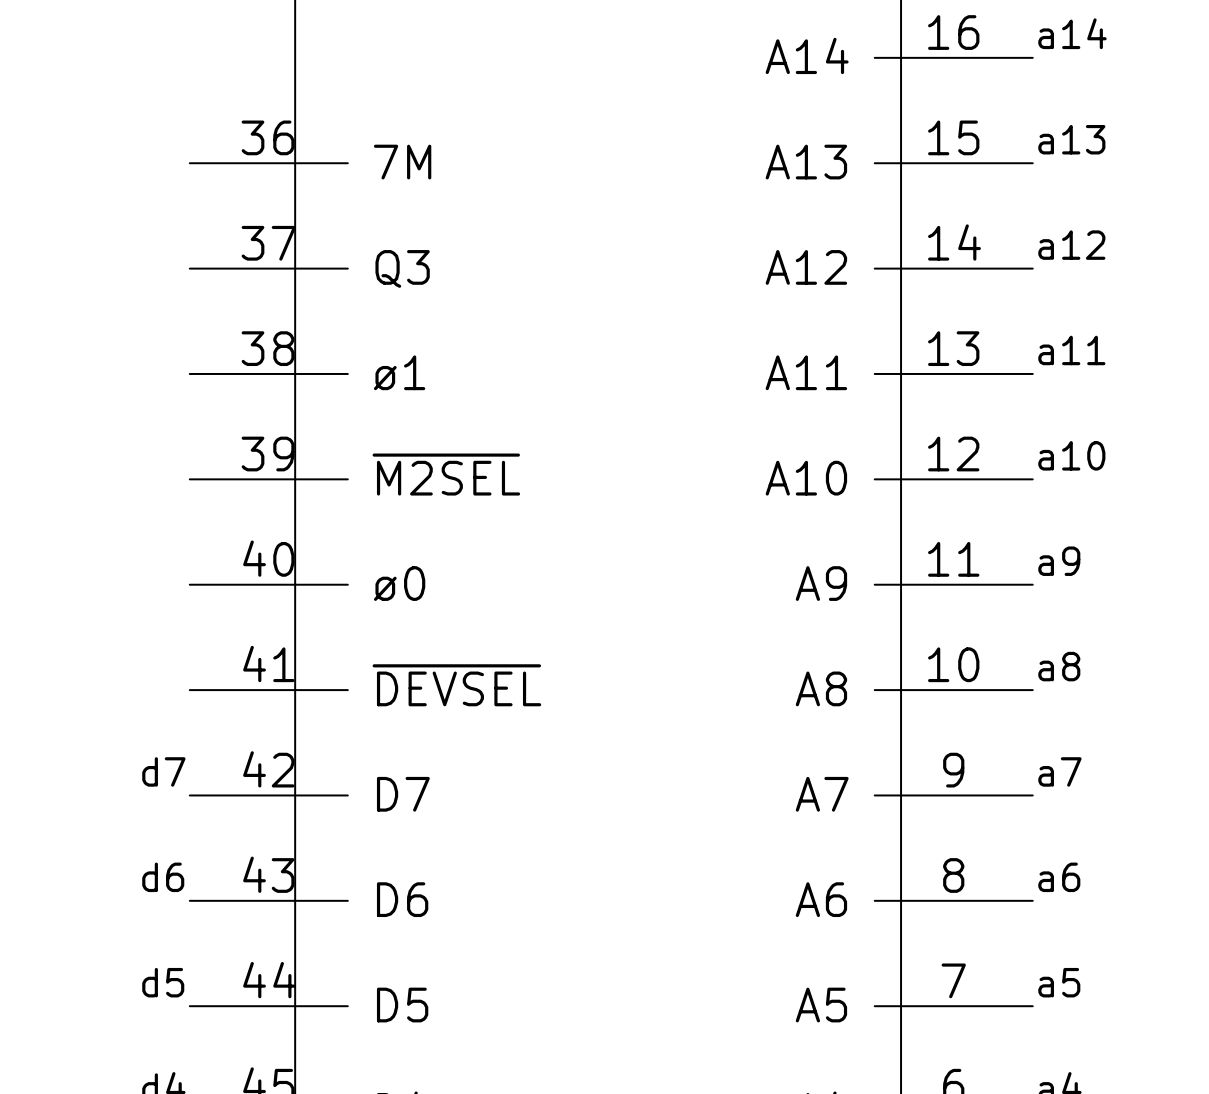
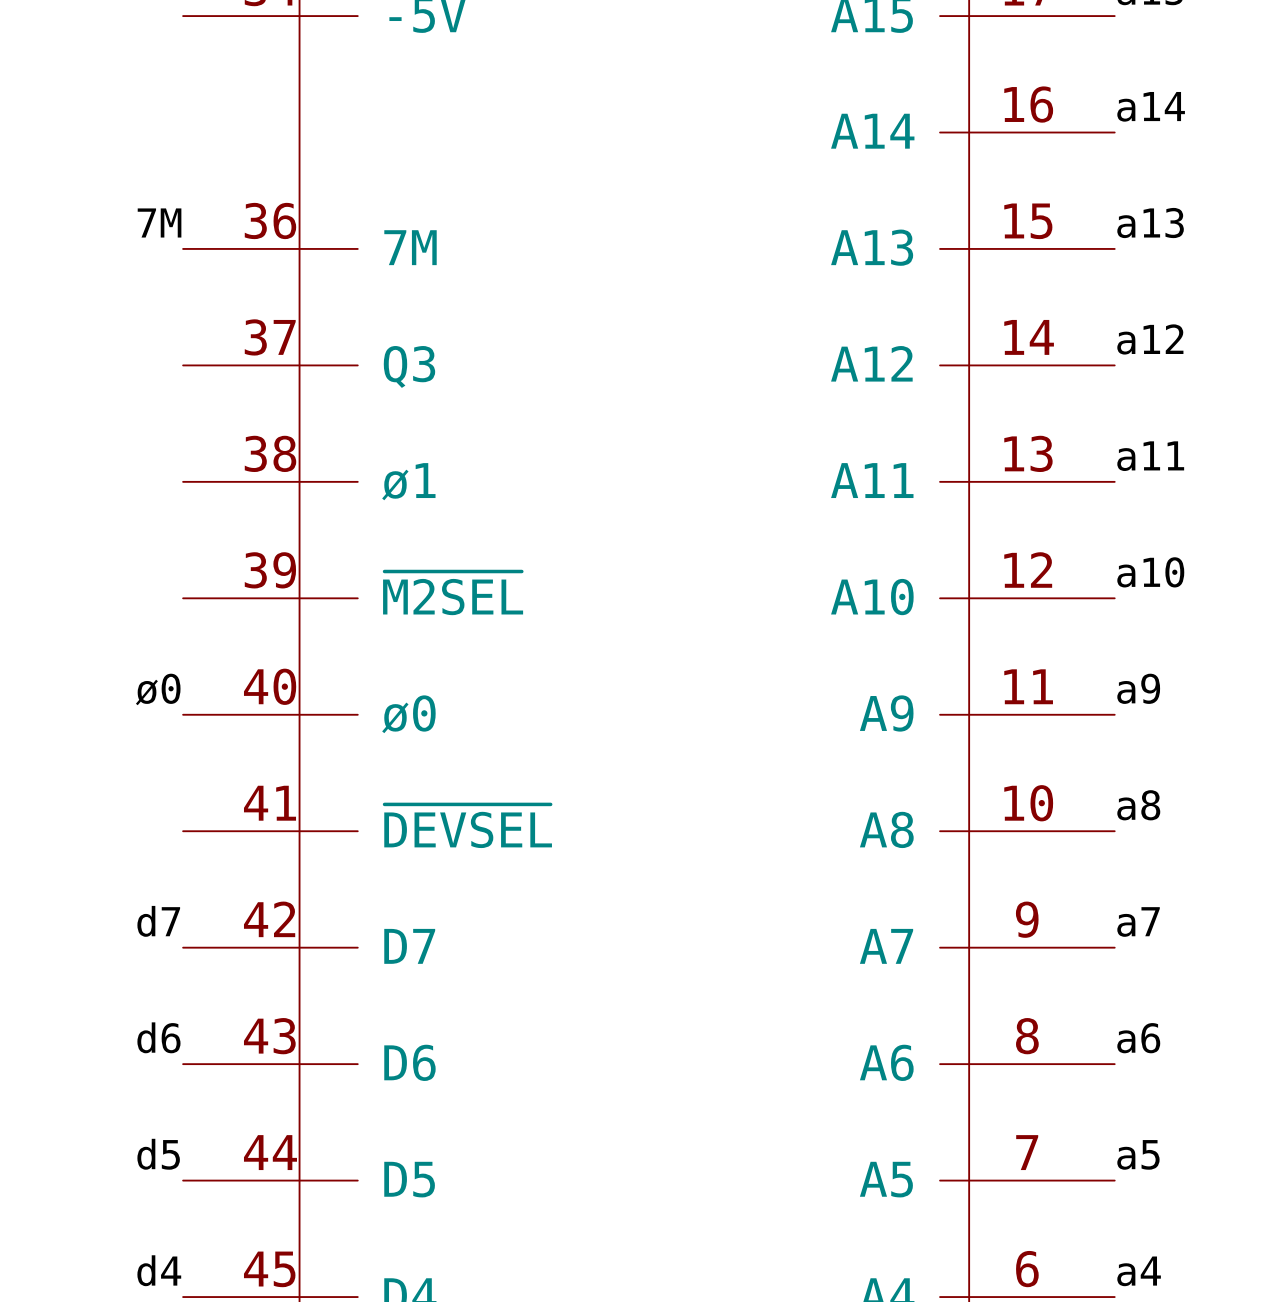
label: none -> 7M (159, 222)
label: none -> ø0 (158, 689)

